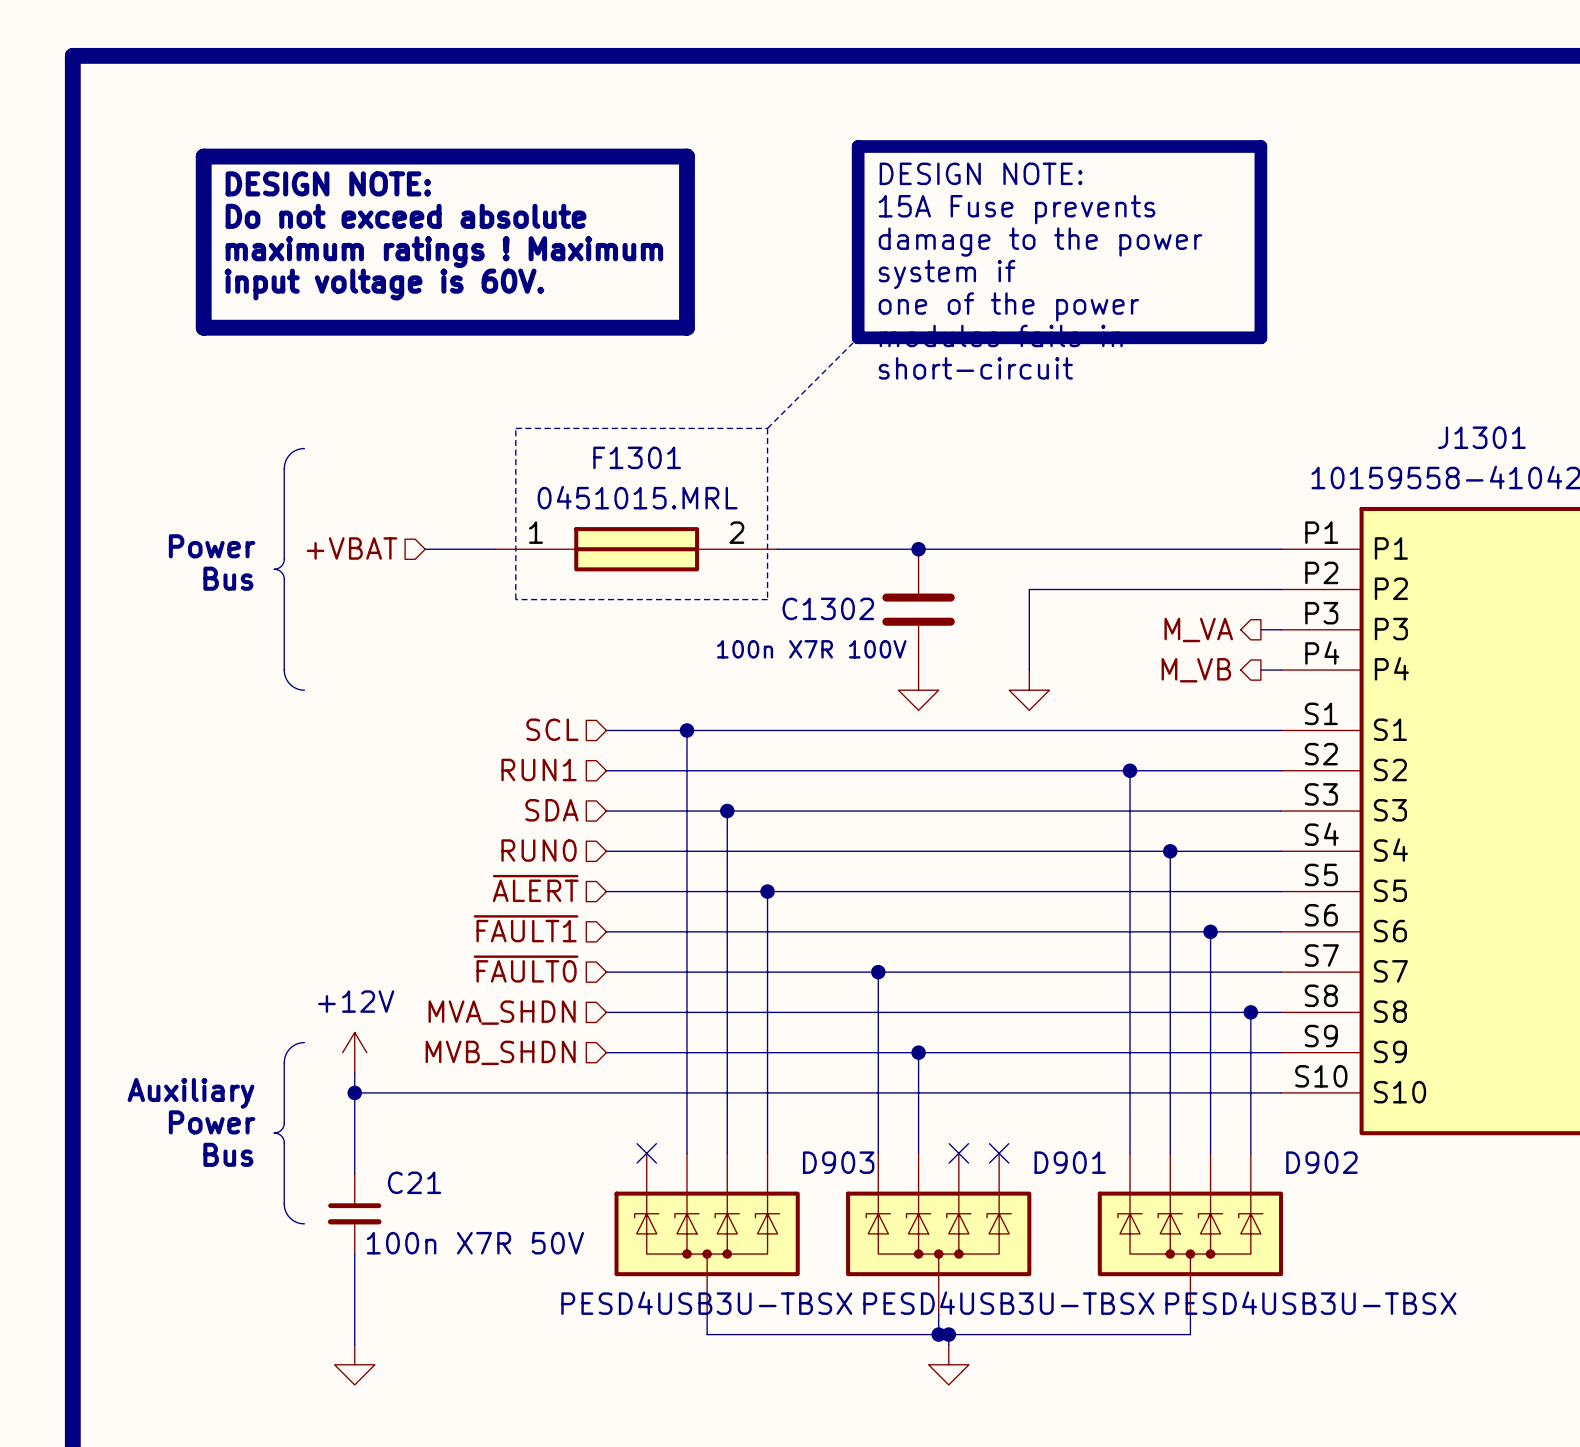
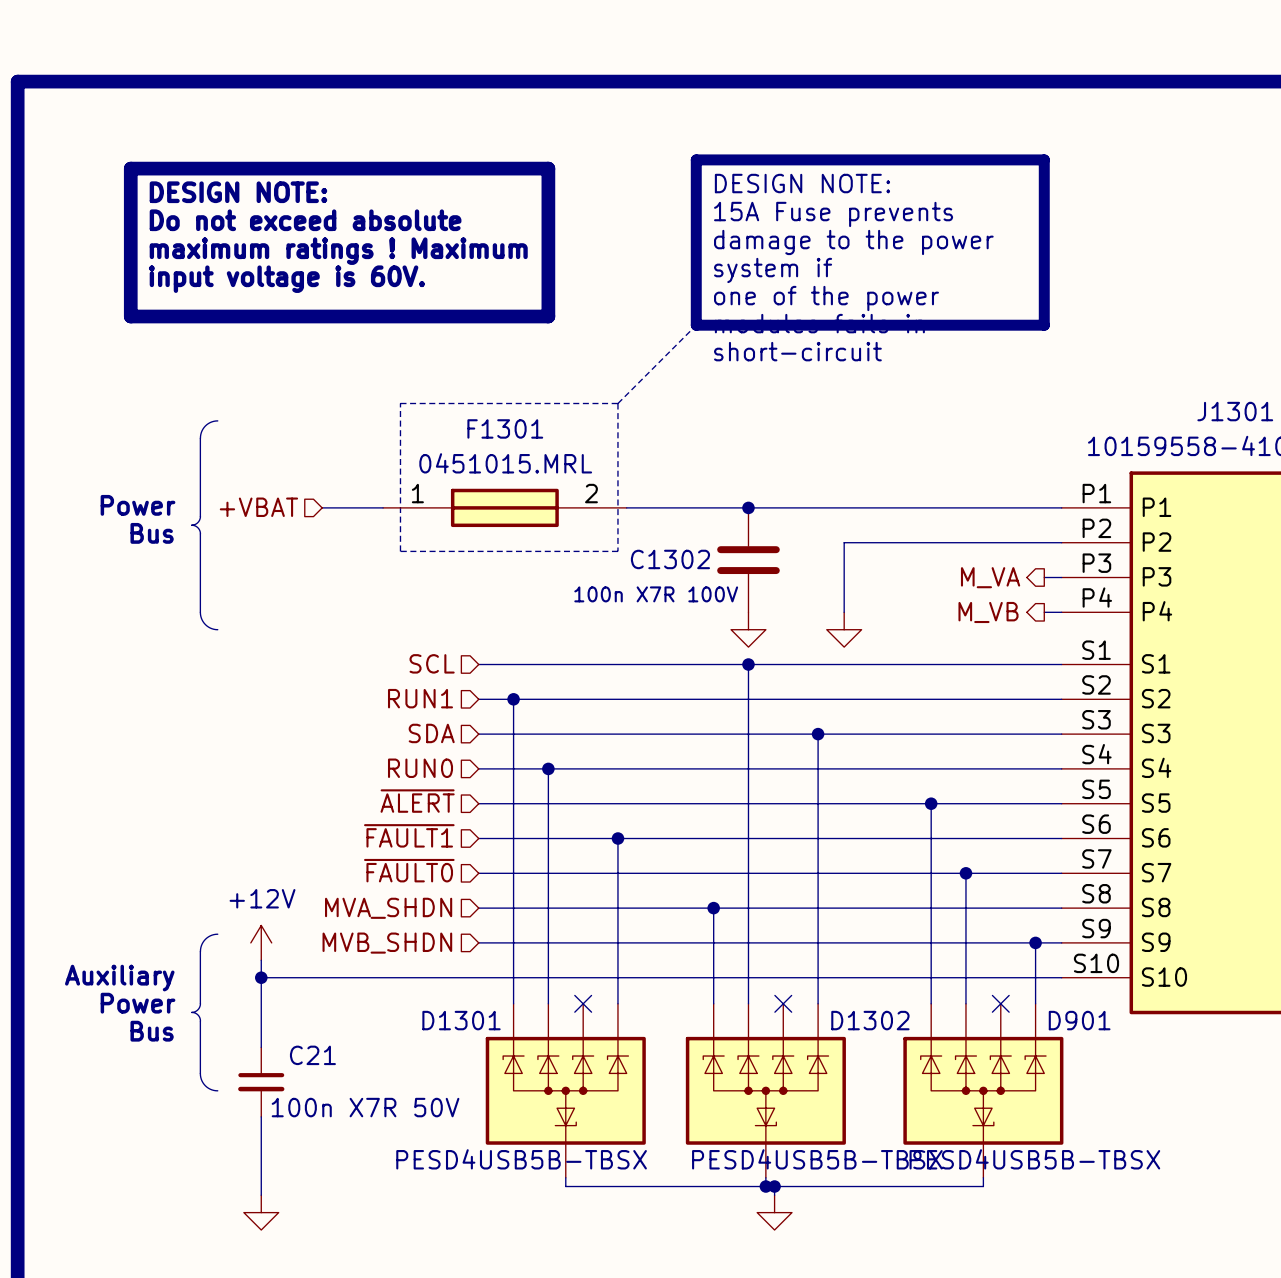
wire: (687, 730) (687, 851) -> none
junction: (687, 730) -> none
wire: none -> (748, 664) (748, 942)
junction: none -> (748, 664)
wire: none -> (513, 699) (513, 1003)
junction: none -> (513, 699)
wire: (1130, 770) (1130, 891) -> none
junction: (1130, 770) -> none
wire: (727, 811) (727, 1153) -> none
junction: (727, 811) -> none
wire: none -> (818, 734) (818, 1003)
junction: none -> (818, 734)
junction: none -> (548, 768)
wire: (1170, 851) (1170, 972) -> none
junction: (1170, 851) -> none
wire: (767, 891) (767, 931) -> none
junction position: (767, 891) -> (617, 838)
junction: none -> (931, 803)
wire: (1210, 931) (1210, 1153) -> none
junction: (1210, 931) -> none
wire: (878, 972) (878, 1012) -> none
junction: (878, 972) -> none
junction: none -> (965, 873)
junction: none -> (713, 908)
wire: (1250, 1012) (1250, 1052) -> none
junction position: (1250, 1012) -> (1035, 942)
junction: (918, 1052) -> none
no-connect mark: none -> (783, 1003)
no-connect mark: none -> (1000, 1003)
no-connect mark position: (646, 1153) -> (583, 1003)
D901 symbol: [846, 1153, 1032, 1315] -> [903, 1003, 1064, 1178]
no-connect mark: (958, 1153) -> none
no-connect mark: (999, 1153) -> none
D1301: none -> PESD4USB5B-TBSX (565, 1090)
D1302: none -> PESD4USB5B-TBSX (765, 1090)
D903: PESD4USB3U-TBSX (707, 1233) -> none
D902: PESD4USB3U-TBSX (1190, 1233) -> none
D901 value: PESD4USB3U-TBSX (1008, 1303) -> PESD4USB5B-TBSX (1034, 1159)

